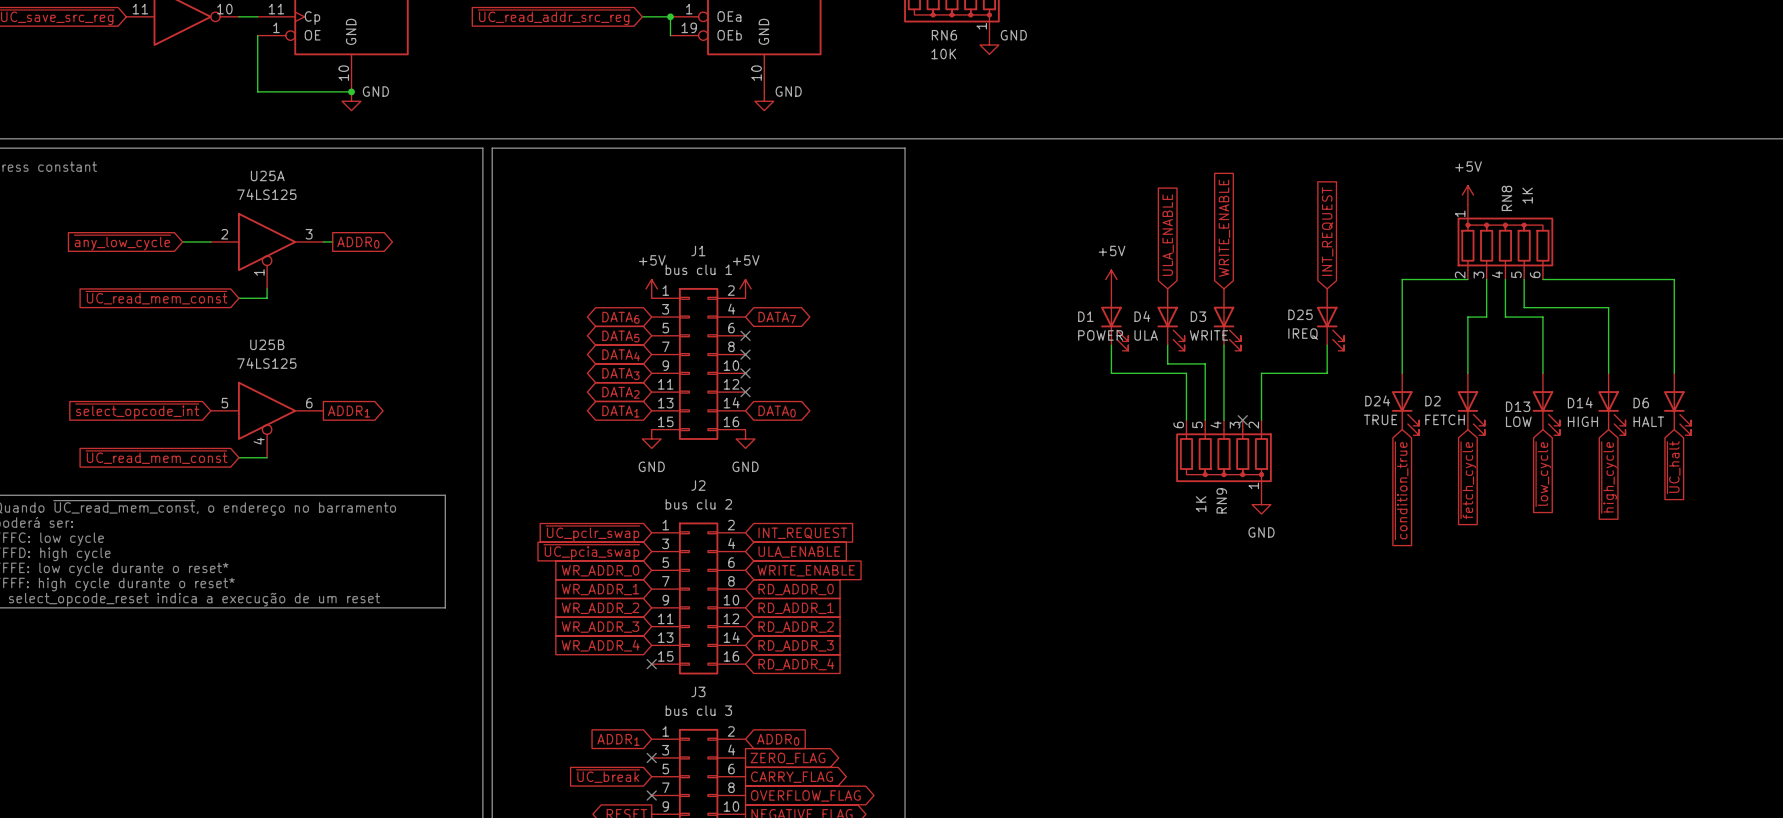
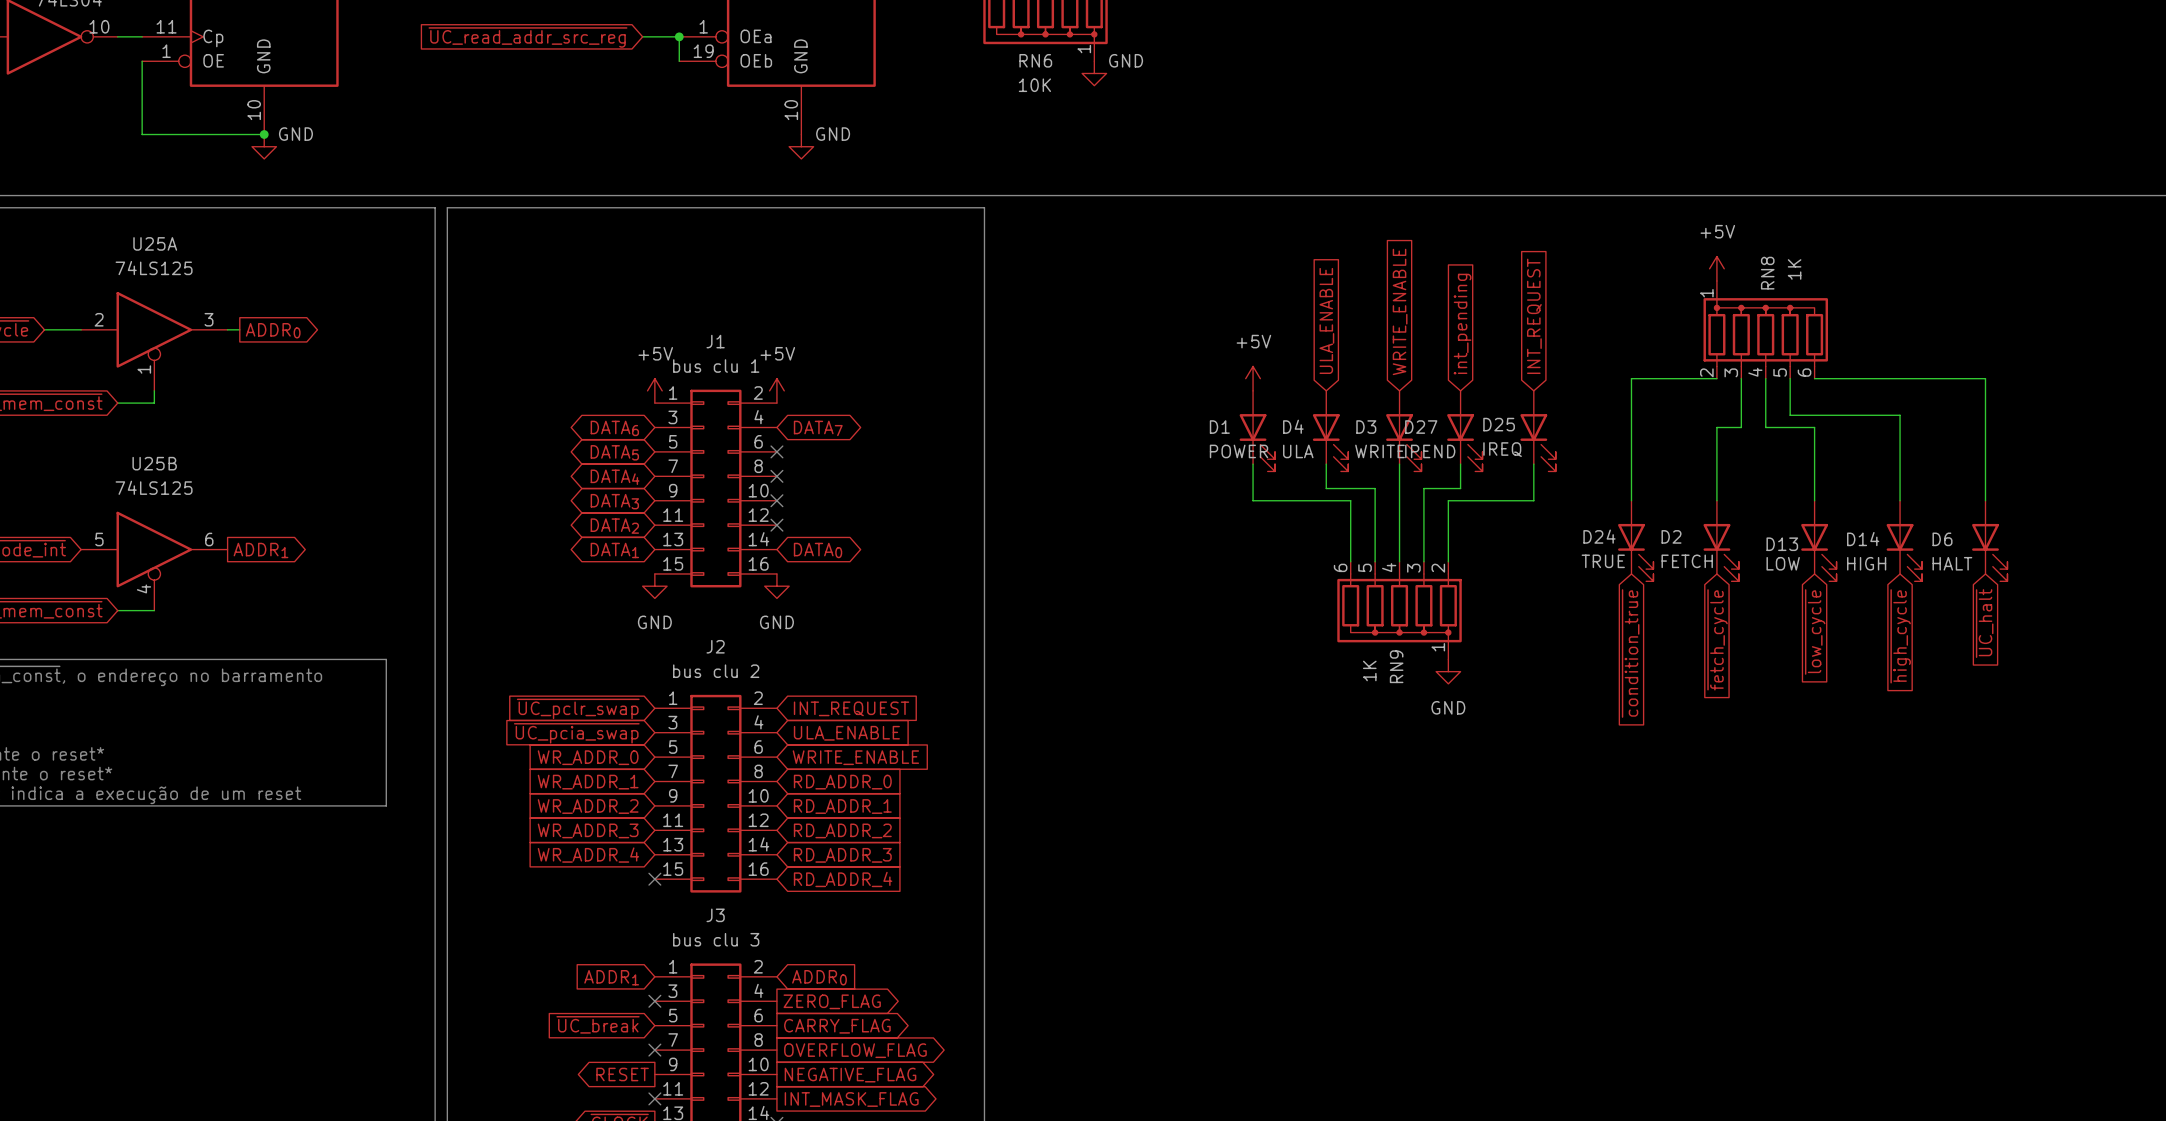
global label: none -> int_pending (1462, 324)
D27: none -> IPEND (1464, 431)
wire: none -> (1460, 464) (1460, 488) (1423, 488) (1423, 561)
no-connect mark: (1242, 420) -> none

